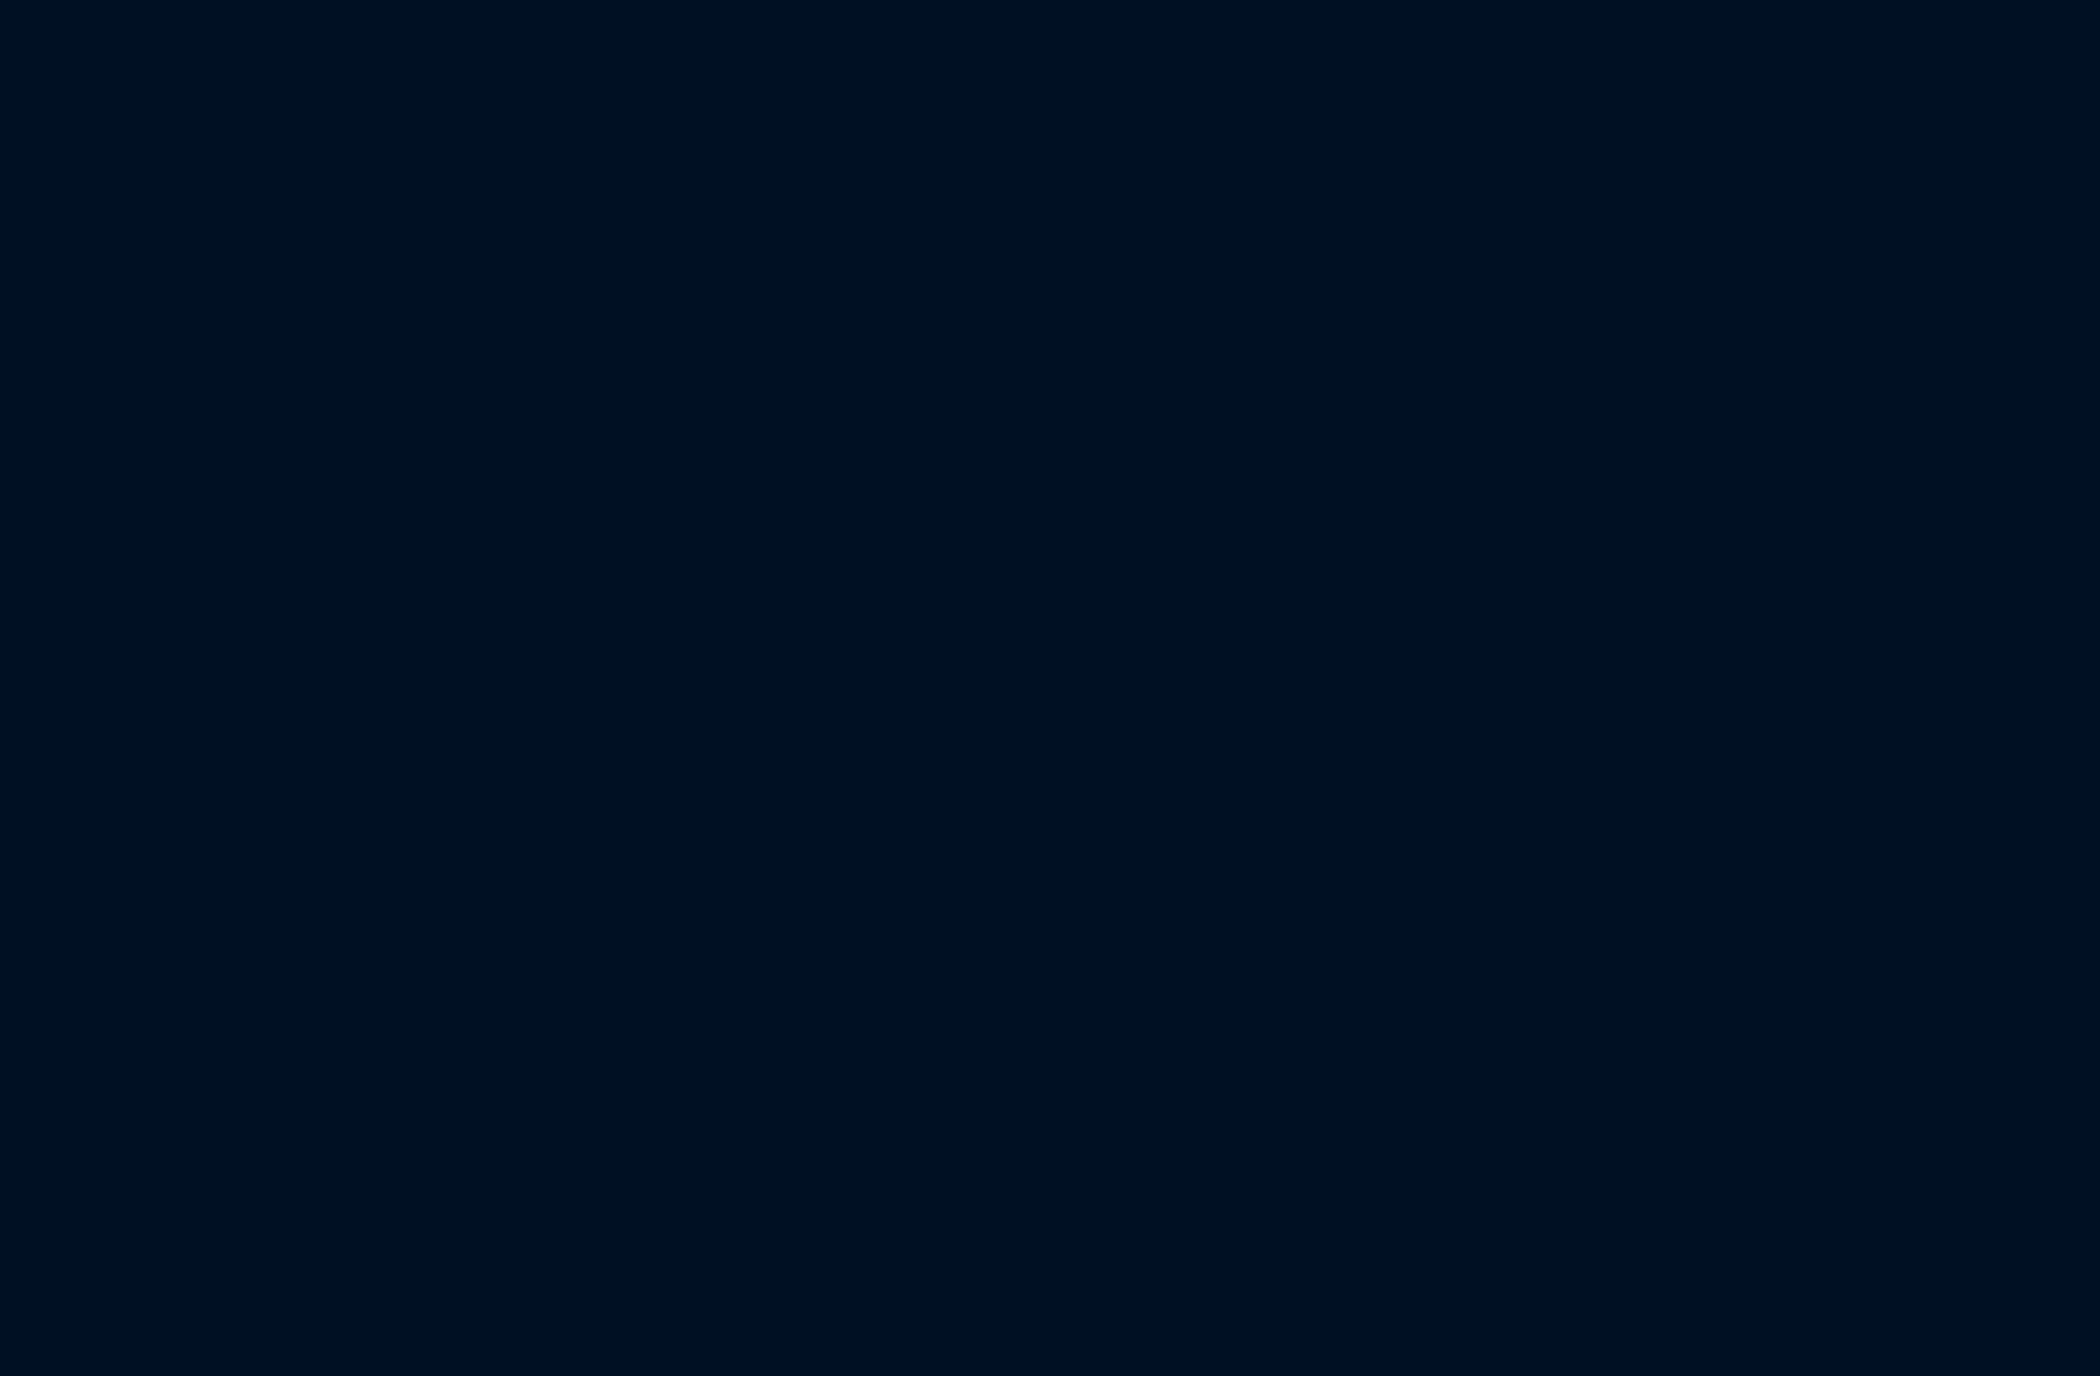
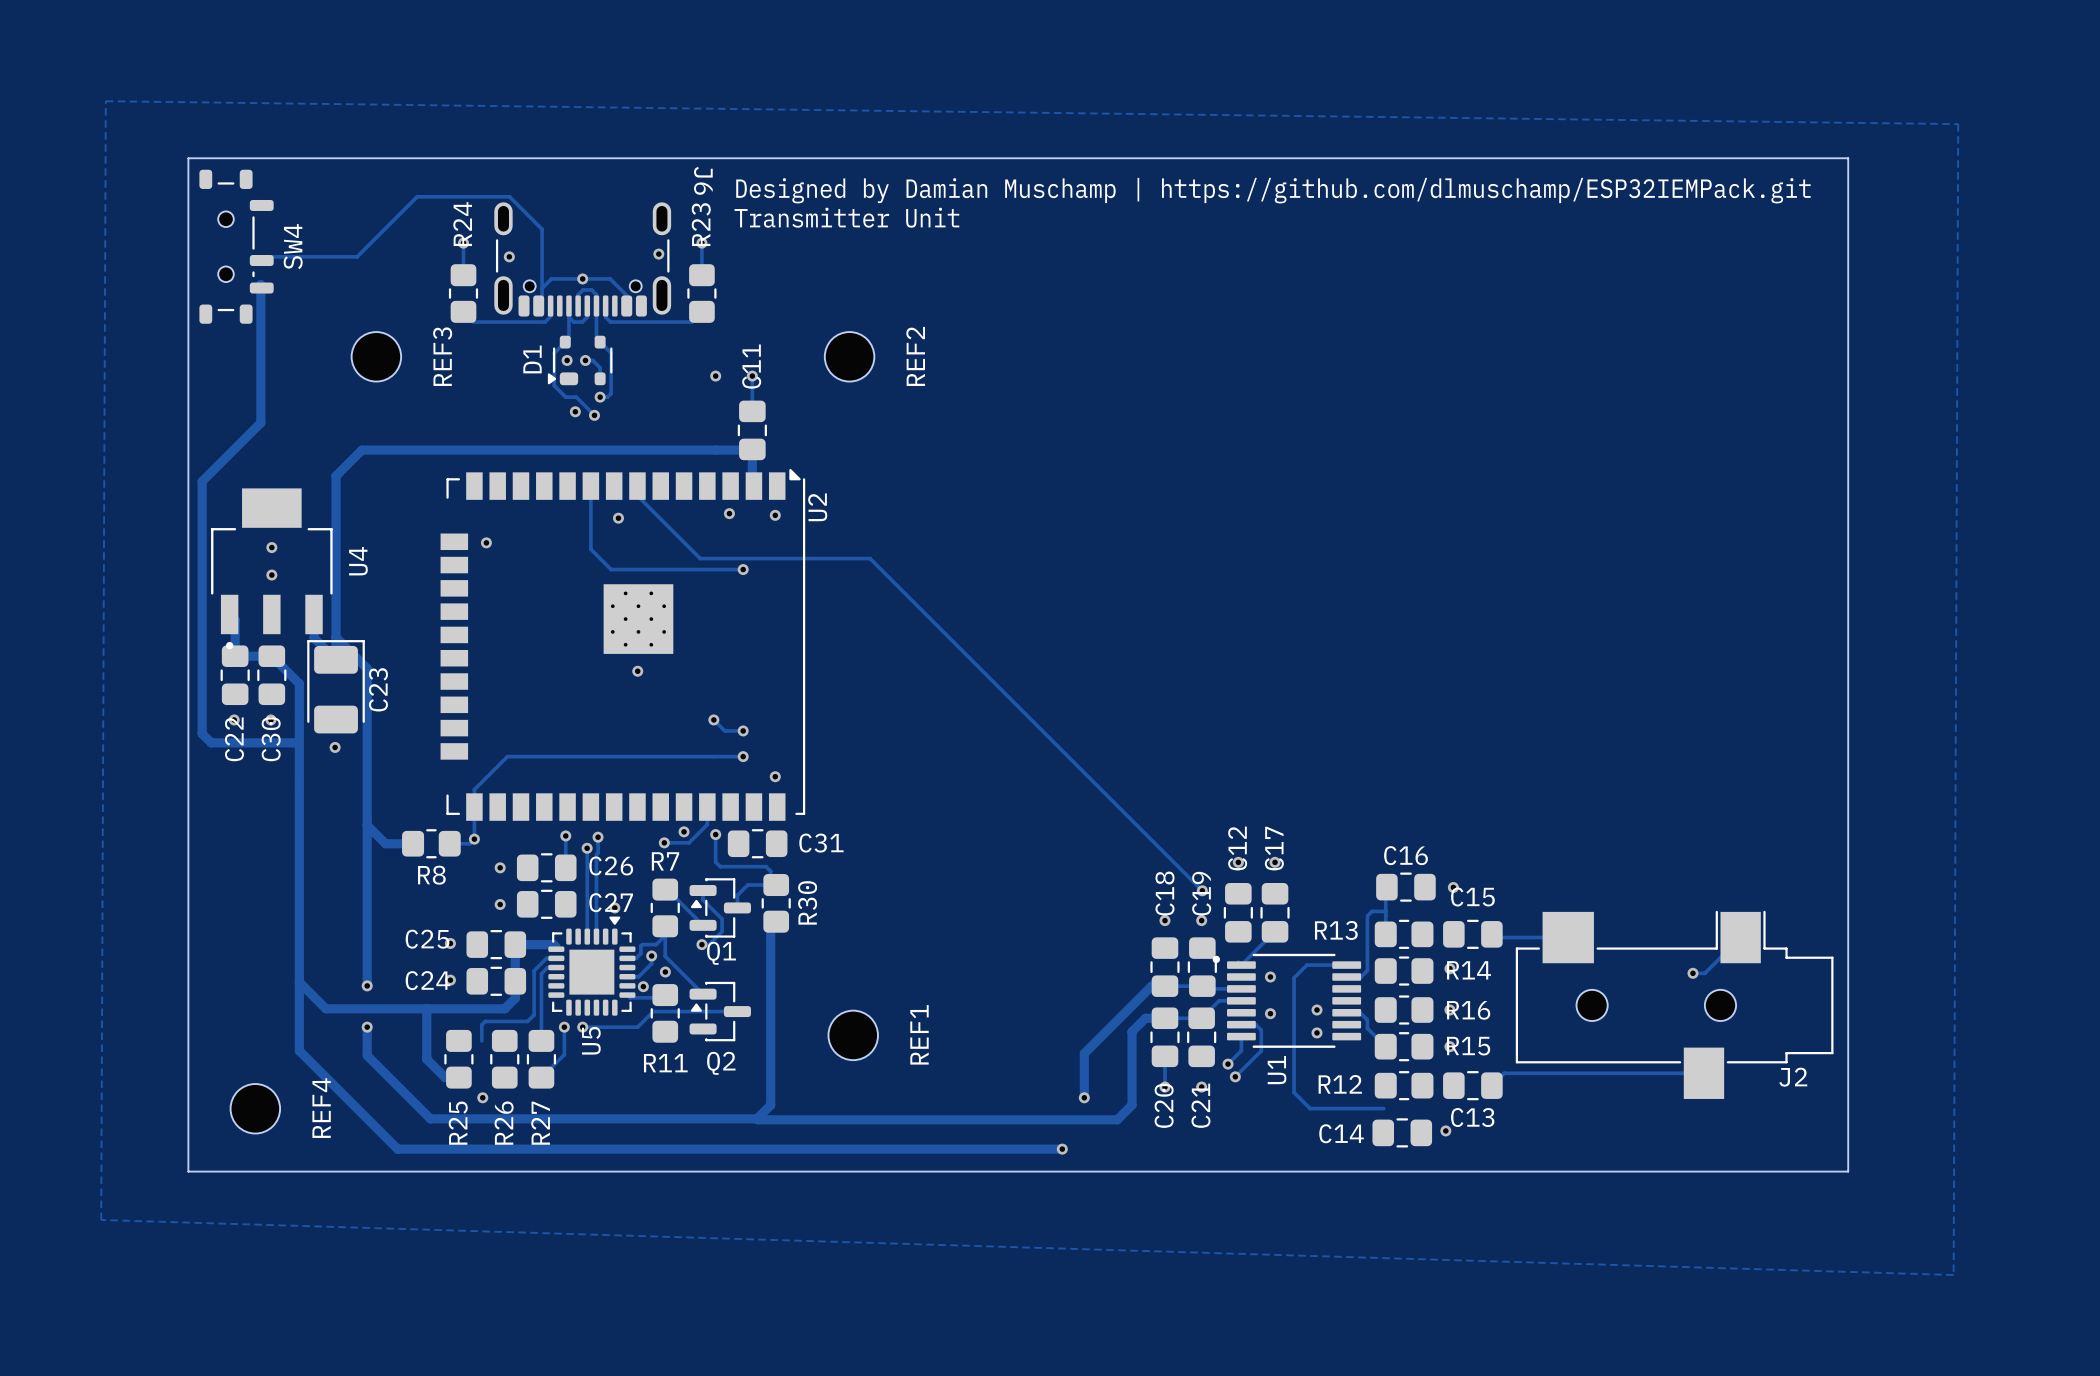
zone outline: none -> (105, 101) (1958, 124) (1953, 1275) (101, 1220) (105, 101)
board edge: none -> (188, 158) (1848, 158) (1848, 1171) (188, 1171) (188, 158)
text: none -> Designed by Damian Muschamp | https://github.com/dlmuschamp/ESP32IEMPack.git (1273, 190)
text: none -> Transmitter Unit (846, 217)
track: none -> (463, 243) (463, 275)
via: none -> (463, 243)
track: none -> (701, 243) (701, 275)
via: none -> (701, 243)
SW4: none -> (236, 246)
via: none -> (658, 254)
track: none -> (260, 256) (357, 256) (417, 196) (509, 196) (542, 229) (542, 302) (536, 307)
via: none -> (509, 256)
J6: none -> (582, 259)
via: none -> (582, 278)
track: none -> (260, 284) (260, 422) (202, 481) (202, 733) (211, 742) (294, 742)
track: none -> (542, 288) (551, 278) (610, 278) (626, 295) (626, 305)
R24: none -> (463, 293)
R23: none -> (701, 293)
track: none -> (550, 305) (550, 316) (545, 322) (473, 322) (463, 311)
track: none -> (568, 305) (568, 338) (554, 353) (554, 385) (565, 397) (576, 397) (594, 415)
track: none -> (578, 305) (578, 294) (583, 289) (591, 289) (596, 294) (596, 338) (611, 353) (611, 393) (607, 397) (600, 397)
track: none -> (587, 305) (587, 317) (582, 322) (573, 322) (568, 317)
track: none -> (605, 305) (605, 317) (610, 322) (691, 322) (701, 311)
REF3: none -> (376, 356)
REF2: none -> (849, 356)
via: none -> (567, 360)
D1: none -> (580, 360)
track: none -> (585, 360) (592, 360) (600, 367) (600, 378)
via: none -> (585, 360)
via: none -> (715, 376)
track: none -> (752, 376) (752, 411)
via: none -> (752, 376)
via: none -> (600, 397)
via: none -> (575, 411)
via: none -> (594, 415)
C11: none -> (752, 430)
track: none -> (590, 486) (590, 549) (611, 569) (743, 569)
track: none -> (637, 486) (637, 495) (700, 558) (870, 558) (1202, 890)
track: none -> (753, 486) (752, 449) (361, 450) (336, 476) (336, 659) (314, 637) (314, 614)
via: none -> (729, 513)
via: none -> (775, 515)
via: none -> (618, 518)
via: none -> (486, 542)
via: none -> (271, 547)
U4: none -> (271, 568)
via: none -> (743, 569)
via: none -> (271, 575)
track: none -> (229, 614) (235, 619) (235, 656) (271, 656) (299, 683) (299, 1050) (397, 1149) (1062, 1149)
track: none -> (336, 637) (367, 668) (367, 985)
U2: none -> (622, 644)
via: none -> (637, 671)
C22: none -> (235, 675)
C30: none -> (271, 675)
C23: none -> (336, 686)
via: none -> (234, 719)
via: none -> (270, 719)
track: none -> (713, 719) (724, 730) (743, 730)
via: none -> (713, 719)
via: none -> (743, 730)
via: none -> (335, 747)
track: none -> (743, 756) (507, 756) (474, 789) (474, 839) (469, 843) (449, 843)
via: none -> (743, 756)
via: none -> (775, 776)
track: none -> (707, 807) (707, 824) (689, 842) (664, 842)
track: none -> (367, 825) (385, 843) (413, 843)
via: none -> (684, 831)
track: none -> (564, 834) (565, 857)
track: none -> (715, 834) (715, 862) (720, 866) (766, 866) (770, 871) (770, 885) (747, 885) (737, 895) (737, 907)
via: none -> (715, 834)
via: none -> (565, 835)
track: none -> (598, 837) (596, 936)
via: none -> (598, 837)
via: none -> (474, 839)
via: none -> (664, 842)
R8: none -> (431, 843)
C31: none -> (757, 843)
track: none -> (587, 848) (587, 936)
via: none -> (587, 848)
via: none -> (1238, 862)
via: none -> (1275, 862)
via: none -> (500, 867)
C26: none -> (546, 867)
C16: none -> (1405, 887)
via: none -> (1453, 887)
track: none -> (665, 889) (703, 925)
track: none -> (703, 890) (703, 900) (722, 919) (722, 931) (709, 944) (701, 944)
via: none -> (1202, 890)
track: none -> (1389, 893) (1385, 897) (1385, 934)
R30: none -> (776, 903)
via: none -> (500, 904)
C27: none -> (546, 904)
via: none -> (614, 907)
R7: none -> (665, 907)
Q1: none -> (720, 907)
track: none -> (1385, 911) (1372, 911) (1367, 916)
C12: none -> (1238, 912)
C17: none -> (1275, 912)
track: none -> (1367, 918) (1367, 970) (1361, 976) (1346, 976)
via: none -> (1164, 920)
via: none -> (1201, 920)
track: none -> (770, 921) (770, 1105) (756, 1118)
track: none -> (665, 926) (665, 956) (703, 994)
track: none -> (1274, 931) (1241, 965) (1238, 962)
R13: none -> (1404, 934)
C15: none -> (1472, 934)
track: none -> (1491, 934) (1495, 937) (1568, 937)
track: none -> (665, 935) (656, 944) (642, 944) (640, 953) (636, 958) (627, 958)
track: none -> (1740, 937) (1704, 973) (1692, 973)
via: none -> (450, 943)
C25: none -> (496, 944)
via: none -> (701, 944)
track: none -> (556, 947) (553, 944) (515, 944) (515, 998) (504, 1008) (325, 1008) (299, 982)
track: none -> (651, 955) (651, 963) (638, 976) (627, 976)
via: none -> (651, 955)
track: none -> (556, 958) (546, 958) (534, 970) (534, 1015) (527, 1021) (485, 1021) (481, 1024) (481, 1040)
track: none -> (1346, 965) (1306, 965) (1294, 977) (1294, 1092) (1310, 1108) (1383, 1108)
U5: none -> (591, 966)
track: none -> (556, 967) (547, 967) (541, 973) (541, 1040)
C18: none -> (1164, 967)
C19: none -> (1202, 967)
via: none -> (1449, 968)
R14: none -> (1404, 971)
via: none -> (665, 972)
via: none -> (1692, 973)
via: none -> (1270, 976)
via: none -> (450, 980)
C24: none -> (496, 981)
via: none -> (367, 985)
via: none -> (643, 986)
track: none -> (1241, 988) (1205, 988) (1202, 986) (1151, 986) (1084, 1053) (1084, 1097)
track: none -> (627, 995) (630, 997) (662, 997)
track: none -> (1241, 1000) (1219, 1000) (1201, 1018) (1145, 1018) (1132, 1031) (1132, 1105) (1117, 1119) (756, 1118)
U1: none -> (1286, 1000)
J2: none -> (1674, 1004)
track: none -> (426, 1008) (426, 1059) (445, 1077) (458, 1077)
via: none -> (1316, 1010)
R16: none -> (1404, 1010)
via: none -> (1449, 1010)
Q2: none -> (720, 1011)
track: none -> (737, 1011) (653, 1011) (637, 1027) (582, 1027)
track: none -> (1346, 1012) (1360, 1012) (1367, 1019) (1367, 1028) (1385, 1046)
R11: none -> (665, 1013)
via: none -> (1270, 1013)
track: none -> (1241, 1024) (1255, 1024) (1261, 1030) (1261, 1050) (1235, 1076)
track: none -> (367, 1027) (367, 1055) (430, 1118) (756, 1118)
via: none -> (367, 1027)
track: none -> (564, 1027) (564, 1054) (541, 1077)
via: none -> (564, 1027)
via: none -> (582, 1027)
via: none -> (1316, 1032)
REF1: none -> (853, 1035)
track: none -> (1241, 1036) (1241, 1050) (1228, 1064)
C20: none -> (1164, 1037)
C21: none -> (1201, 1037)
R15: none -> (1404, 1046)
via: none -> (1449, 1046)
track: none -> (1164, 1056) (1164, 1087)
R25: none -> (458, 1059)
R26: none -> (504, 1059)
R27: none -> (541, 1059)
via: none -> (1228, 1064)
track: none -> (1703, 1073) (1504, 1073) (1491, 1085)
via: none -> (1235, 1076)
R12: none -> (1404, 1085)
C13: none -> (1472, 1085)
via: none -> (1164, 1087)
via: none -> (1201, 1087)
via: none -> (482, 1097)
via: none -> (1084, 1097)
REF4: none -> (255, 1108)
via: none -> (1445, 1130)
C14: none -> (1402, 1132)
via: none -> (1062, 1149)

